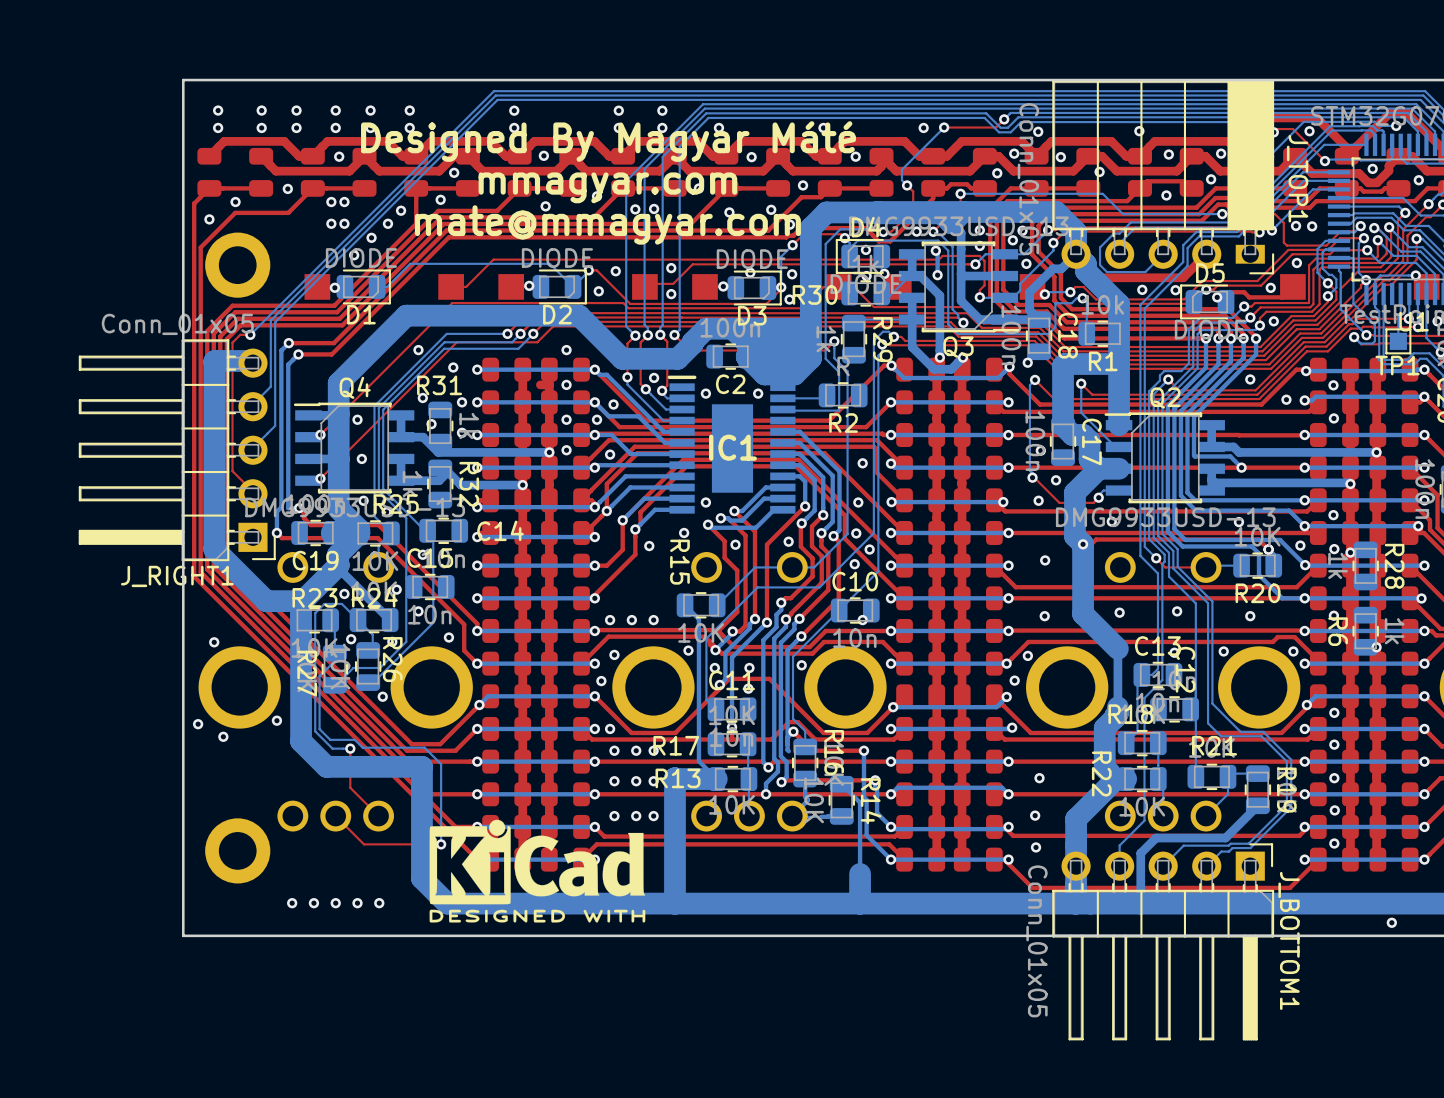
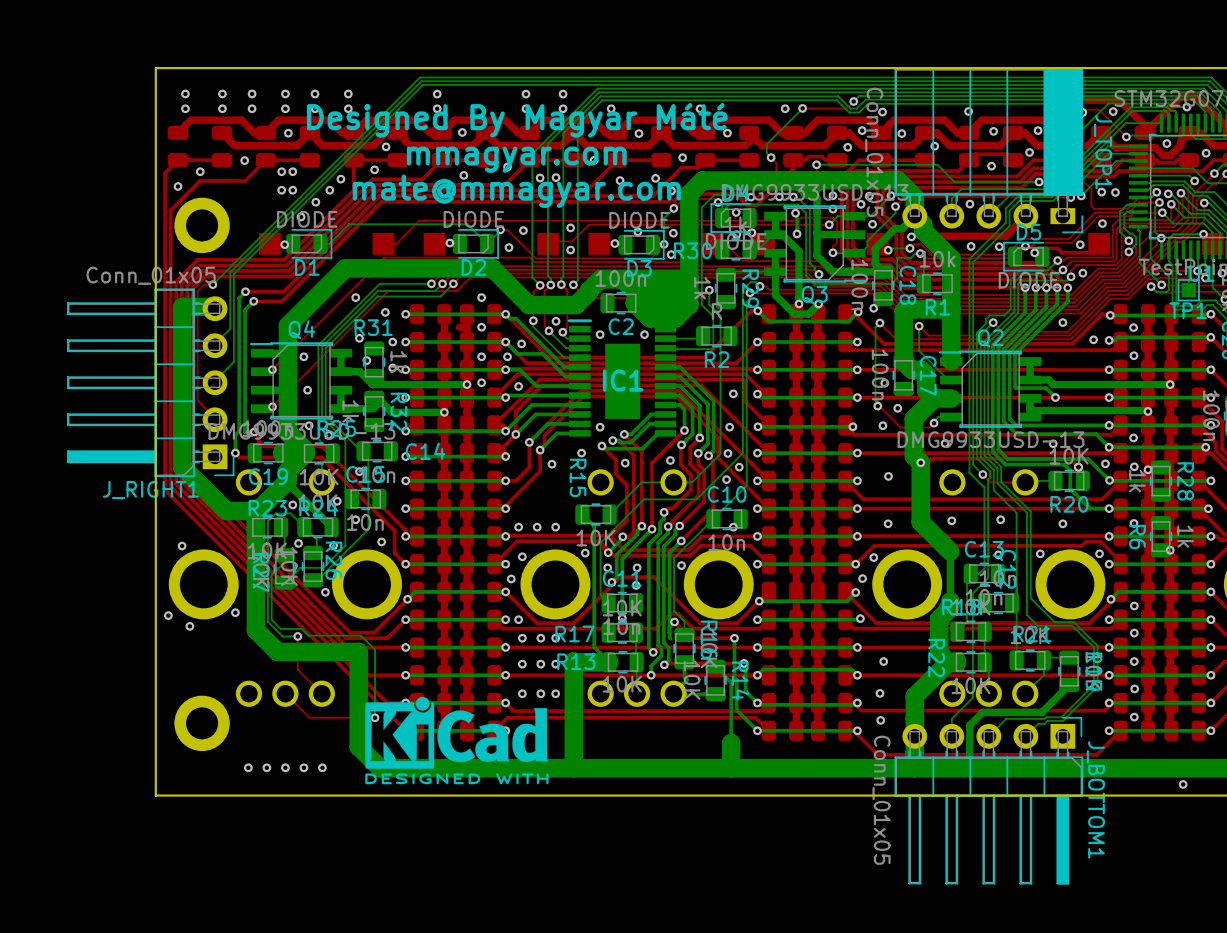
bottom track: (1189, 227) (1135, 227) (1119, 243) -> (1011, 193) (988, 216)
bottom track: (1119, 233) (1113, 233) (1100, 247) (1100, 265) (1106, 272) (1145, 272) (1160, 257) -> (951, 198) (951, 206)
via: none -> (969, 204)
via: none -> (911, 236)

